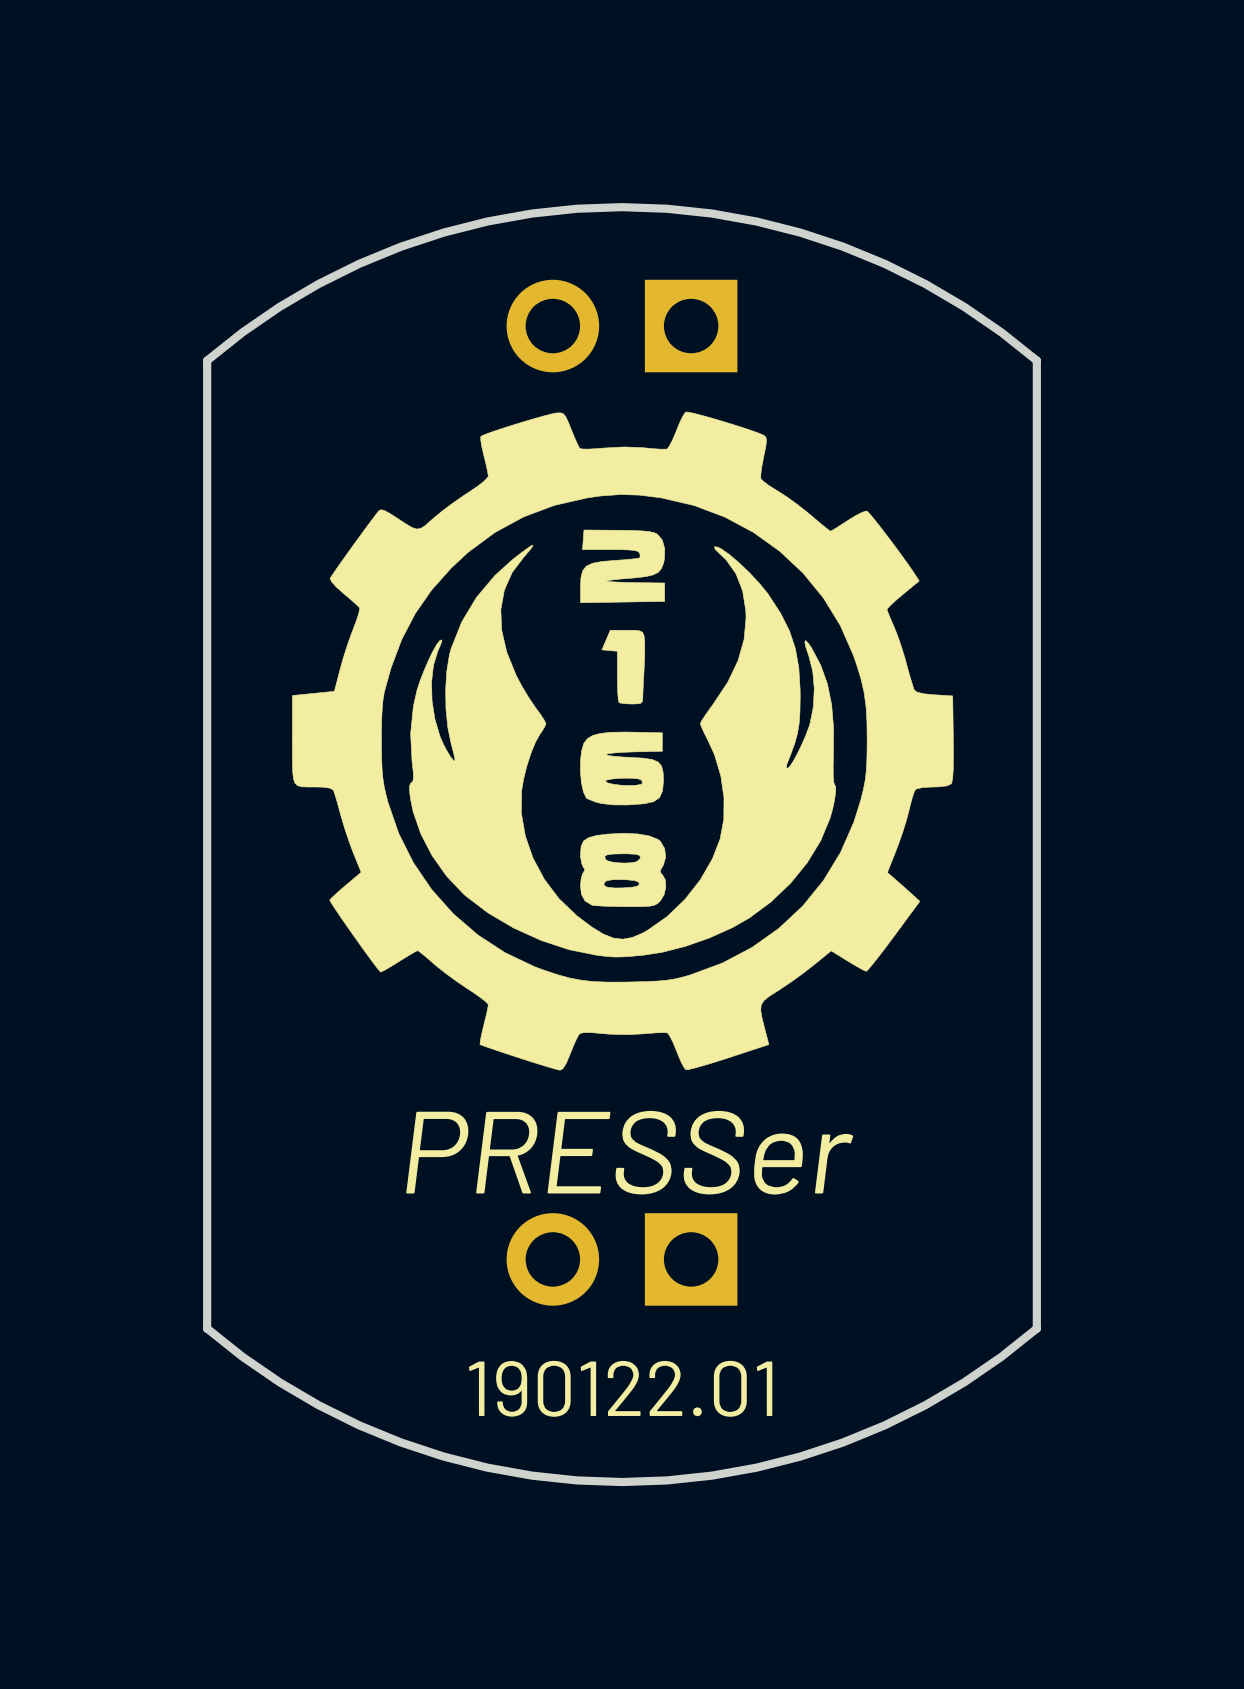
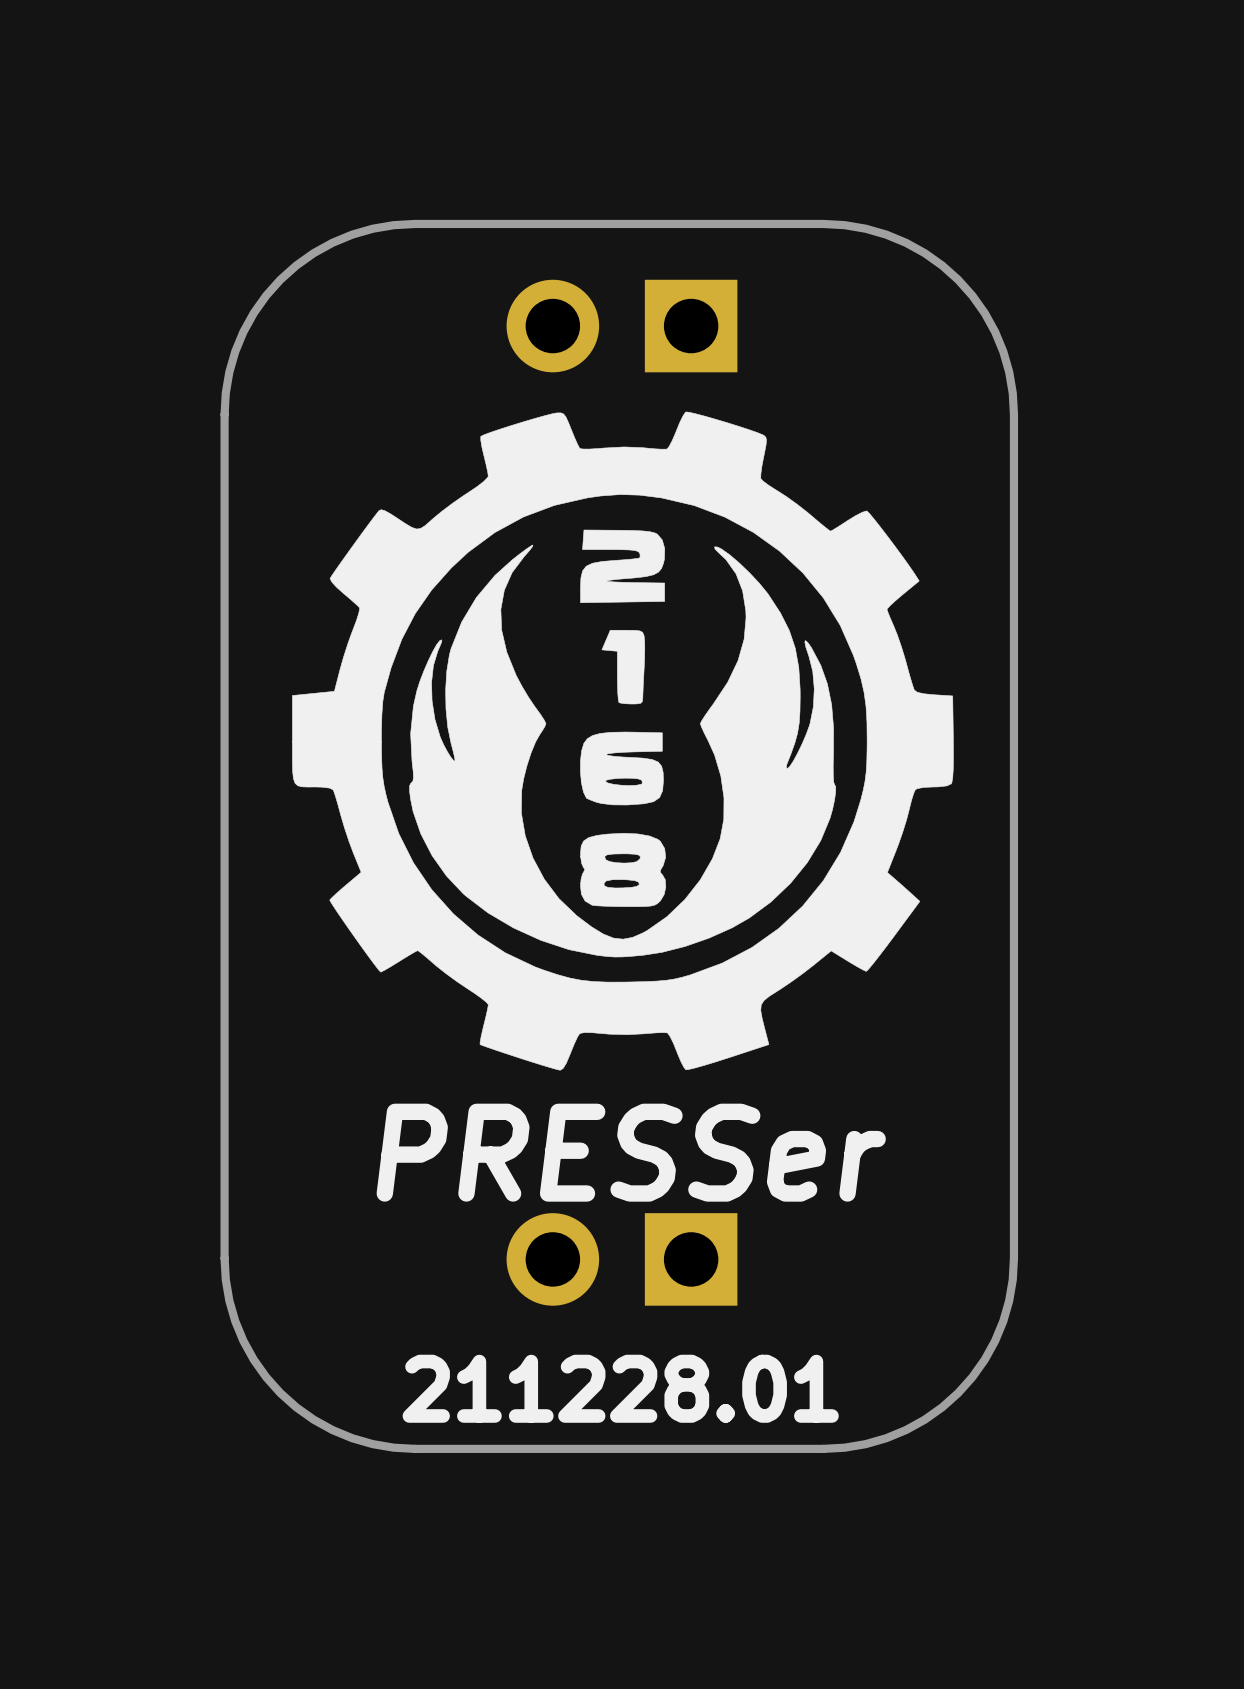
board edge: (1036, 360) (1036, 1328) (1001, 1356) (964, 1382) (925, 1405) (884, 1425) (843, 1442) (800, 1456) (756, 1467) (712, 1475) (667, 1480) (621, 1482) (576, 1480) (531, 1475) (487, 1467) (443, 1456) (400, 1442) (359, 1425) (318, 1405) (279, 1382) (242, 1356) (207, 1328) (207, 360) (242, 332) (279, 306) (318, 283) (359, 263) (400, 246) (443, 232) (487, 221) (531, 213) (576, 208) (621, 207) (667, 208) (712, 213) (756, 221) (800, 232) (843, 246) (884, 263) (925, 283) (964, 306) (1001, 332) (1036, 360) -> (823, 223) (865, 228) (886, 234) (924, 253) (958, 279) (984, 313) (995, 331) (1003, 351) (1012, 393) (1013, 1258) (1009, 1300) (1003, 1321) (984, 1359) (972, 1377) (942, 1407) (906, 1430) (865, 1444) (823, 1448) (415, 1448) (372, 1444) (352, 1438) (332, 1430) (296, 1407) (266, 1377) (243, 1341) (229, 1300) (225, 1279) (224, 414) (229, 372) (235, 351) (243, 331) (266, 295) (296, 265) (332, 242) (372, 228) (415, 223) (823, 223)
text: 190122.01 (620, 1388) -> 211228.01 (620, 1388)

